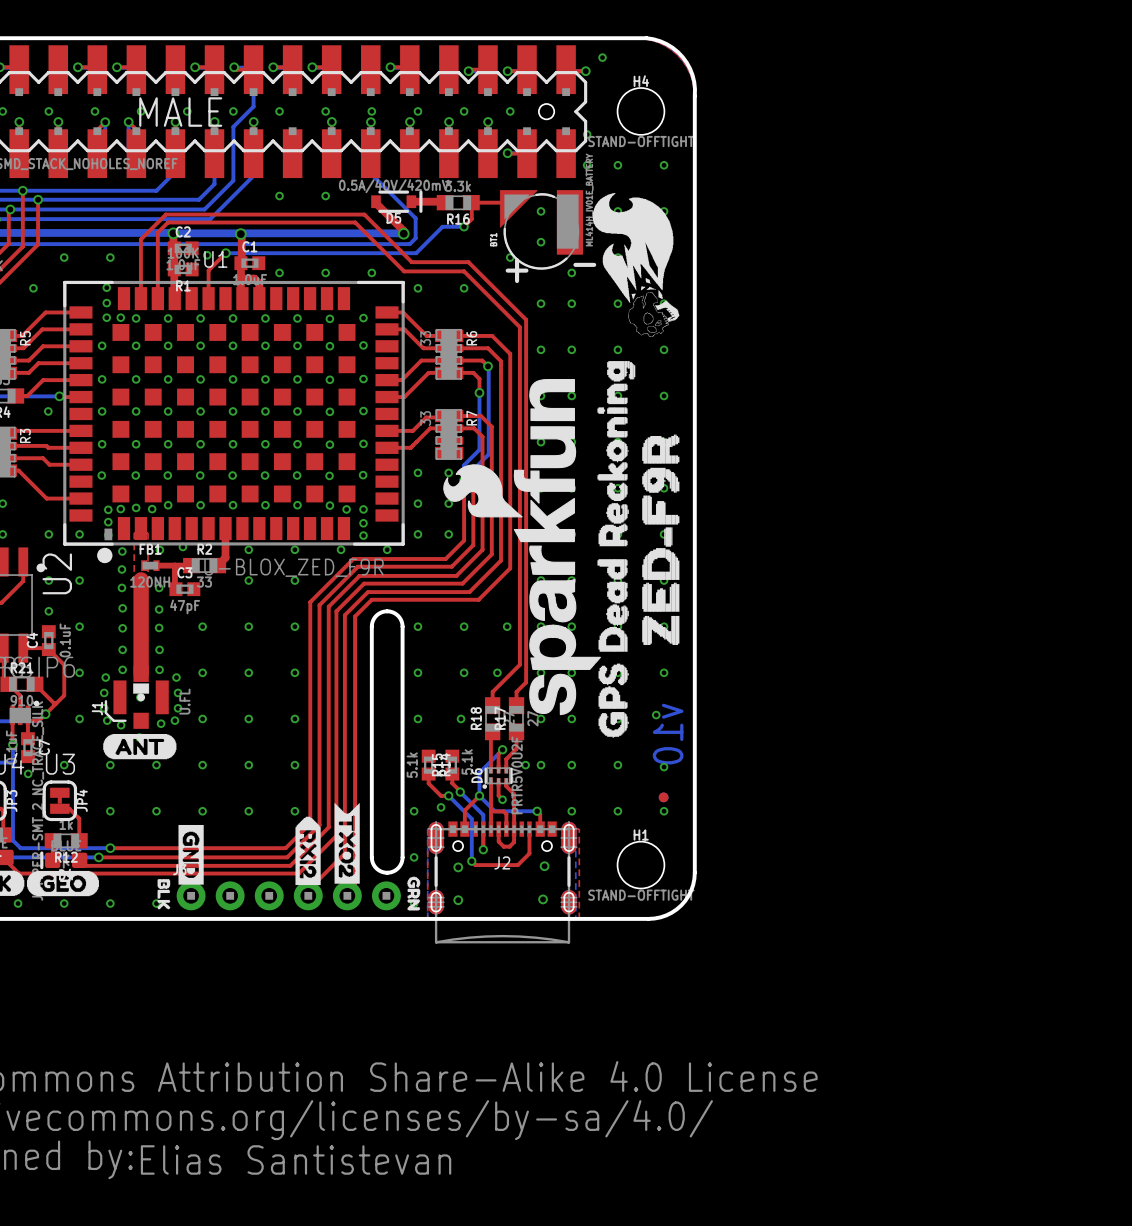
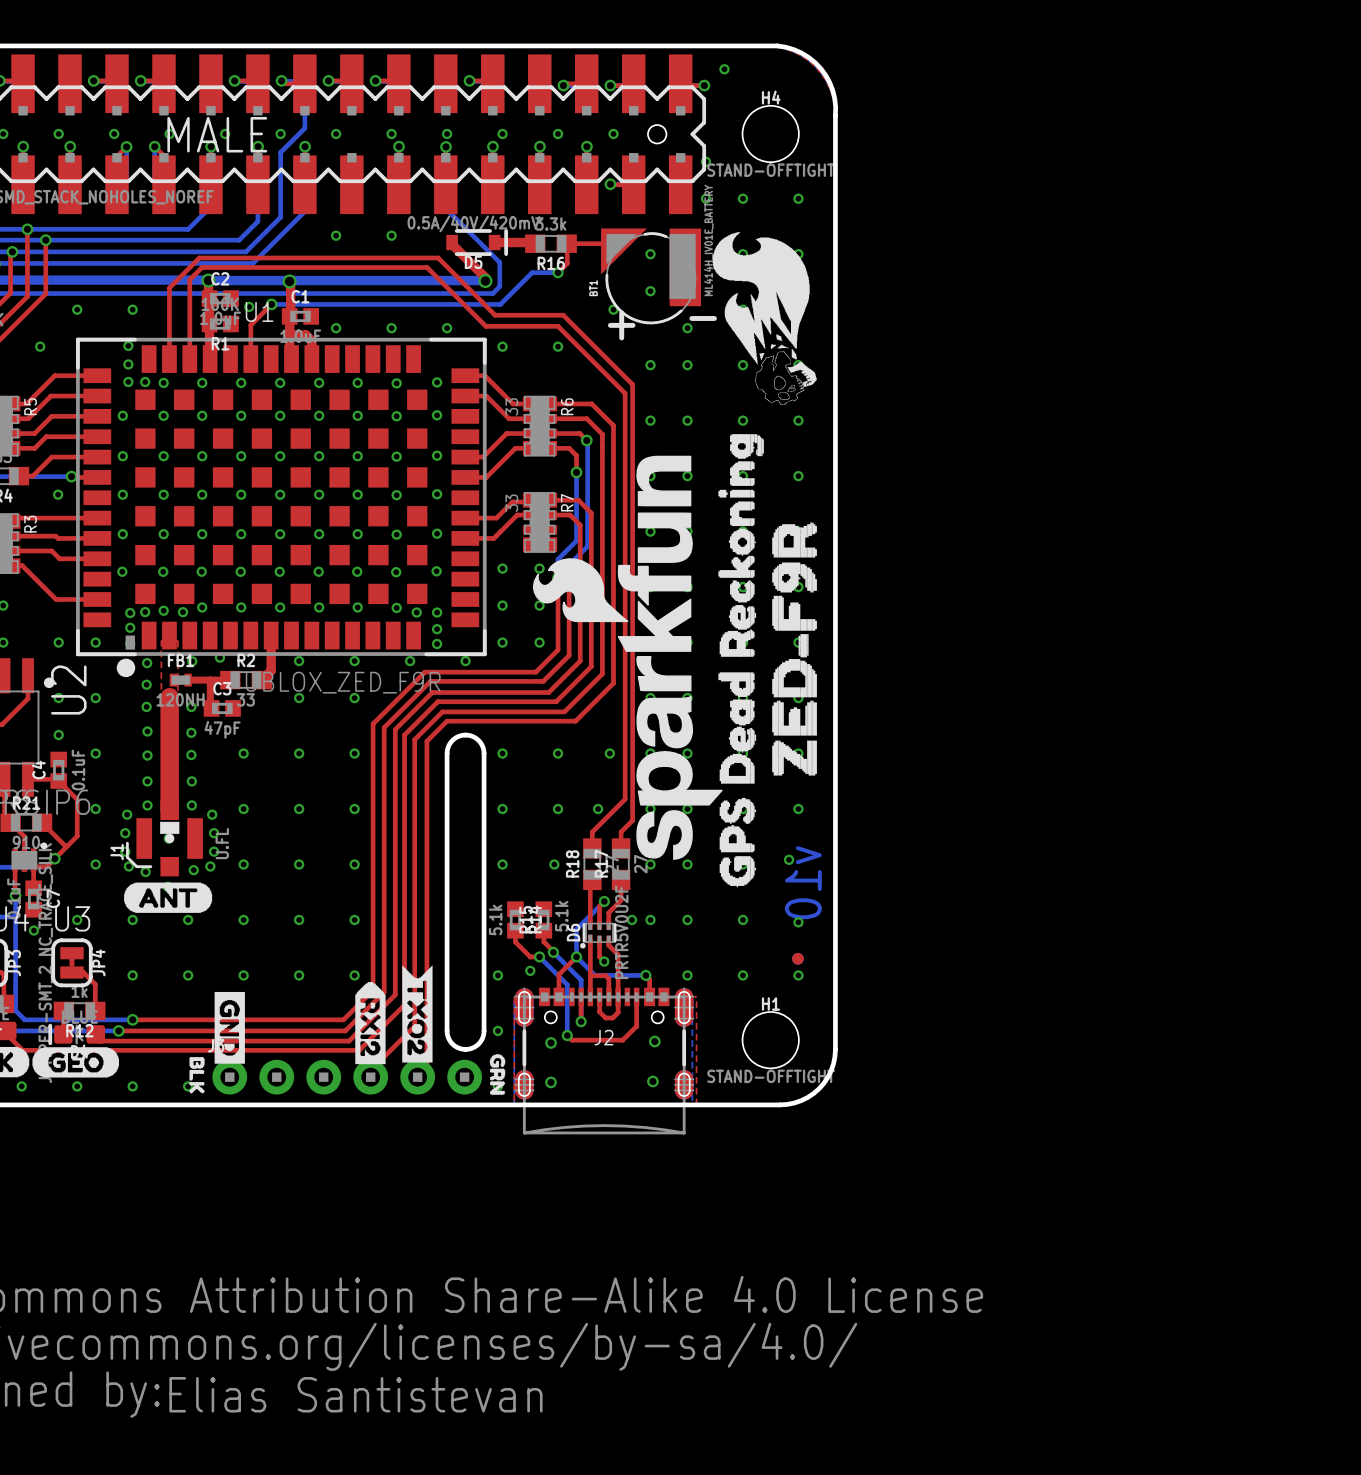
U1 value: U-BLOX_ZED_F9R (294, 567) -> UBLOX_ZED_F9R (343, 682)

